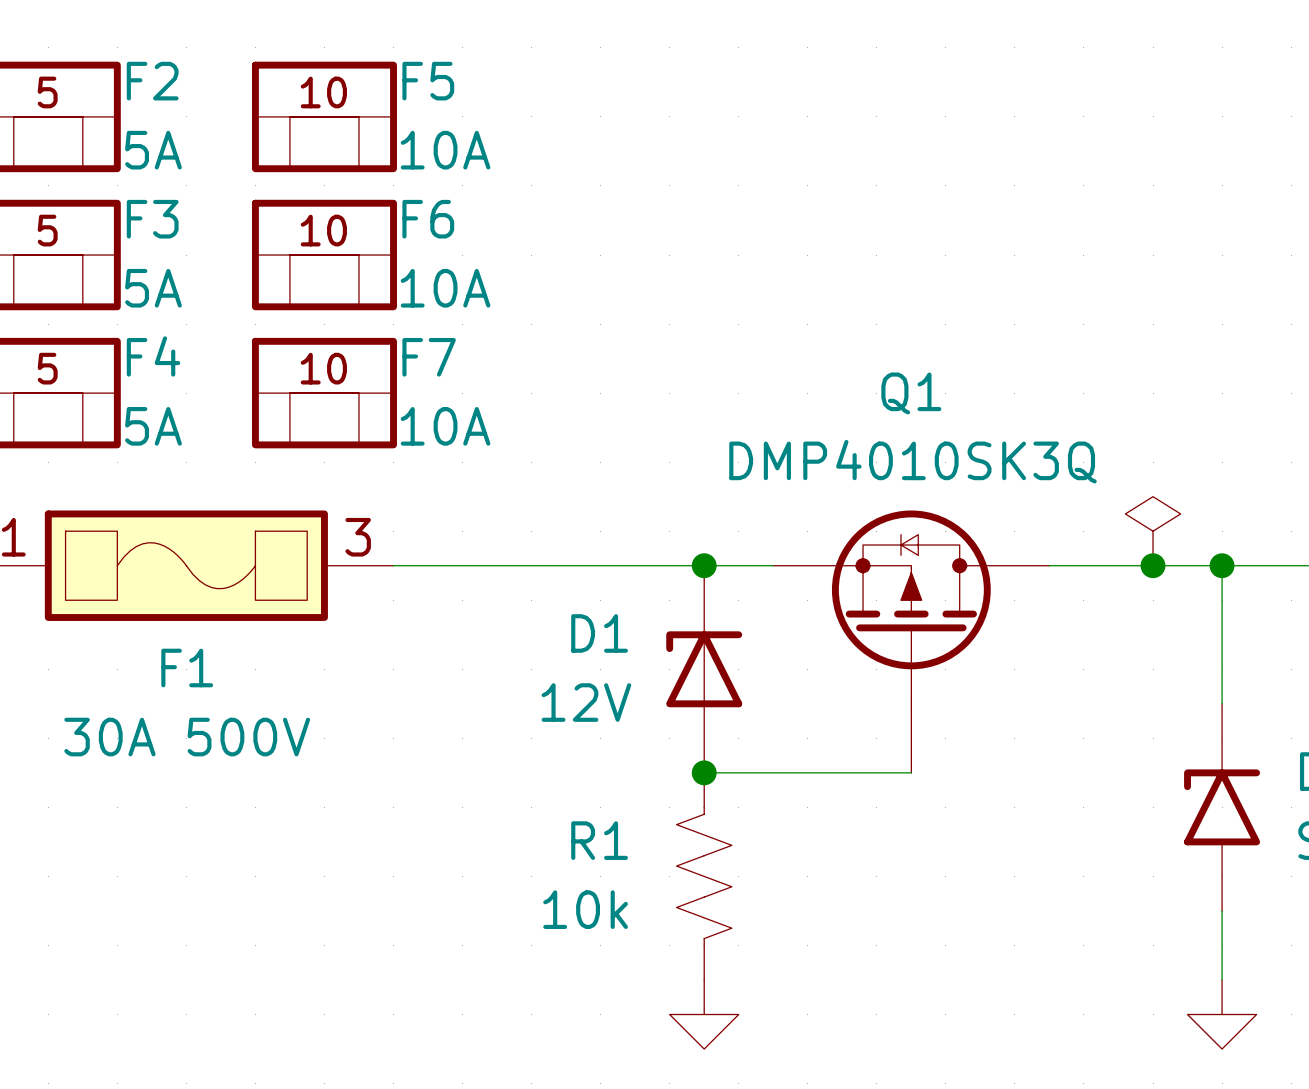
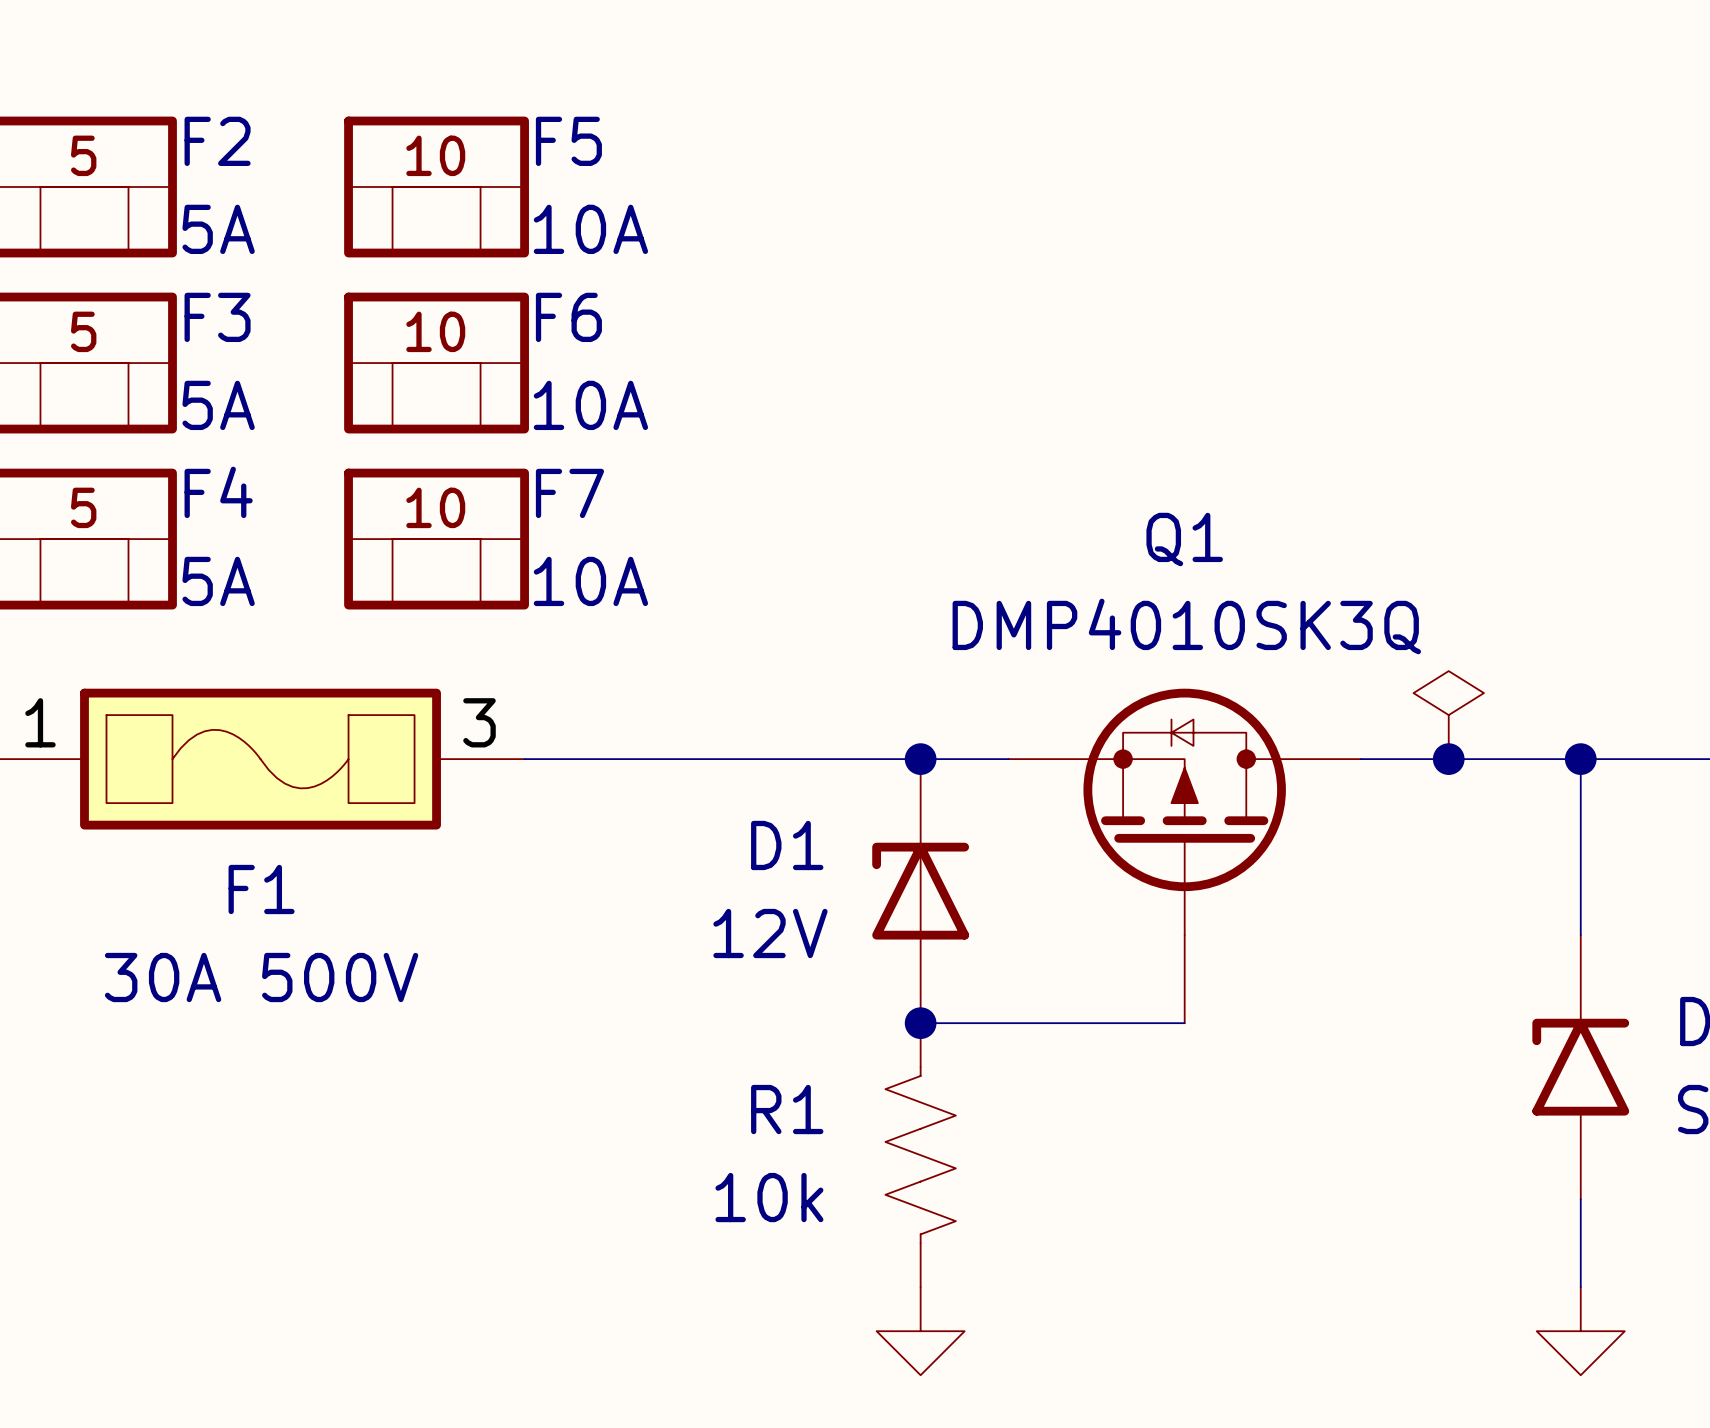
power symbol position: (1153, 531) -> (1448, 715)
junction position: (1153, 565) -> (1448, 759)

